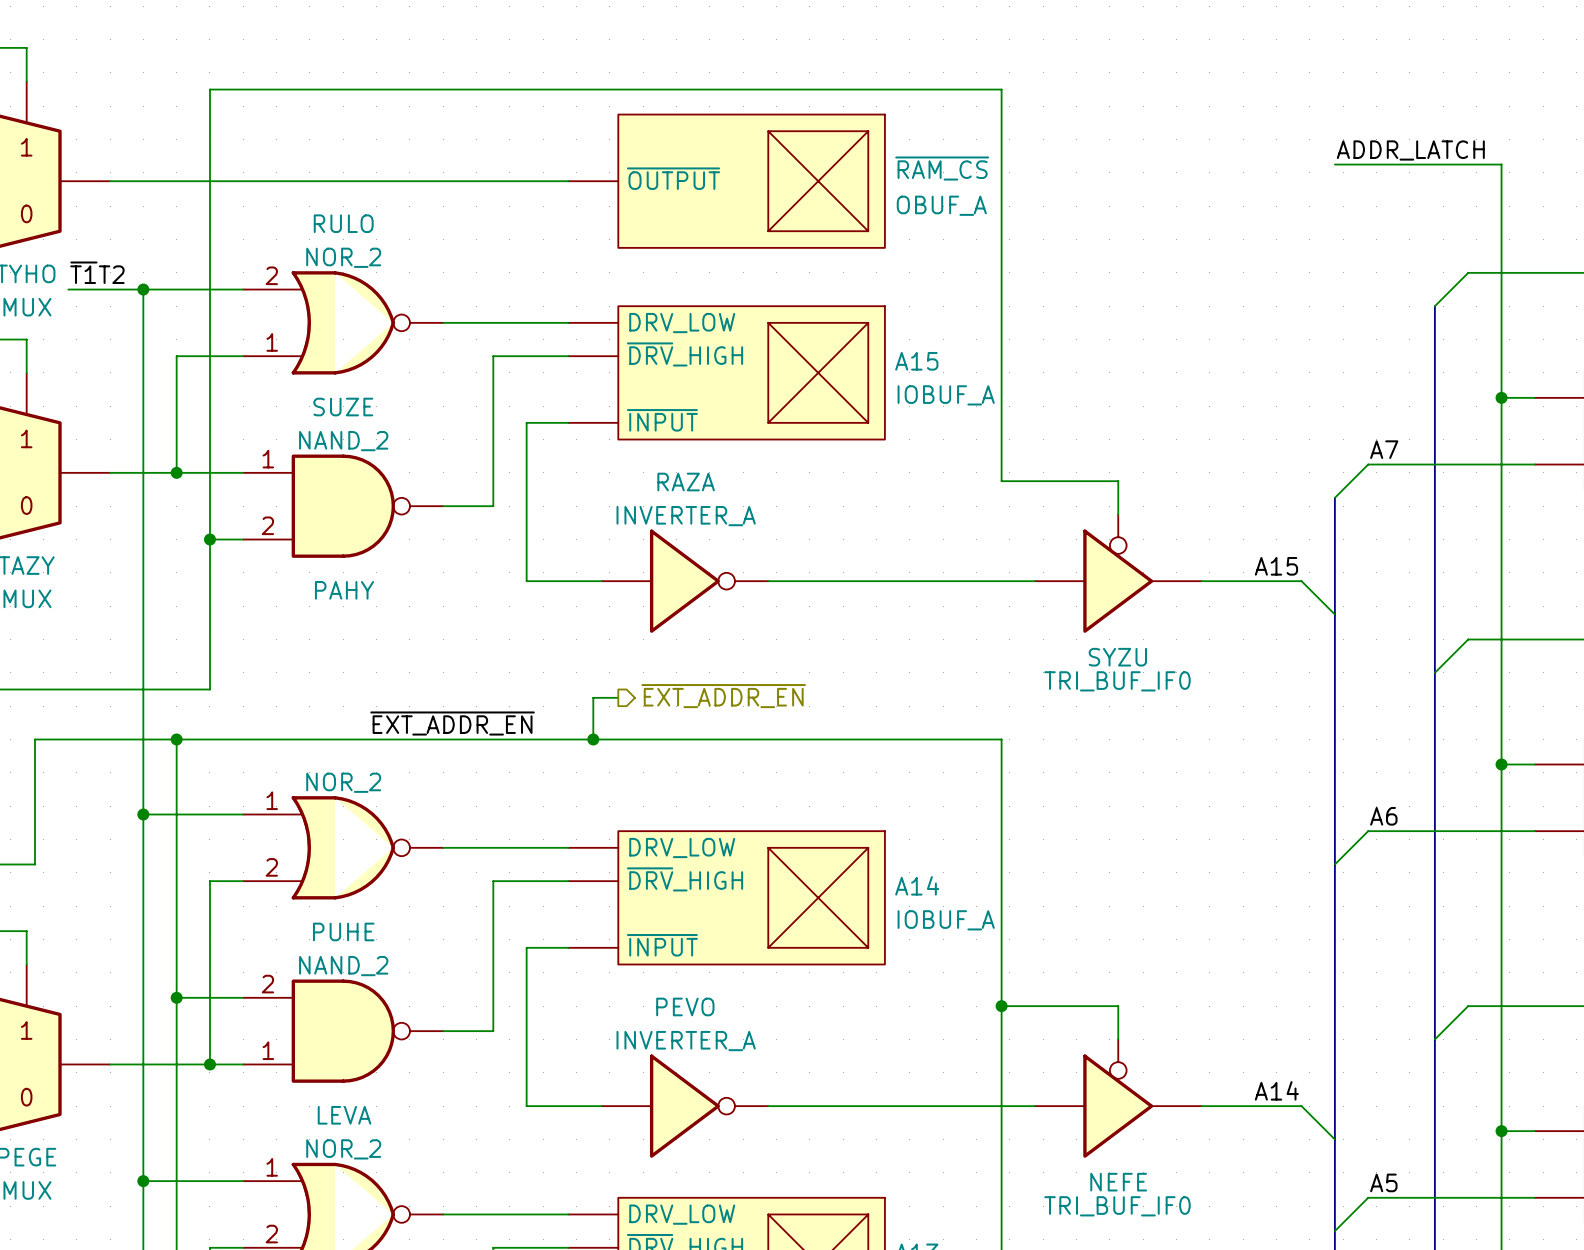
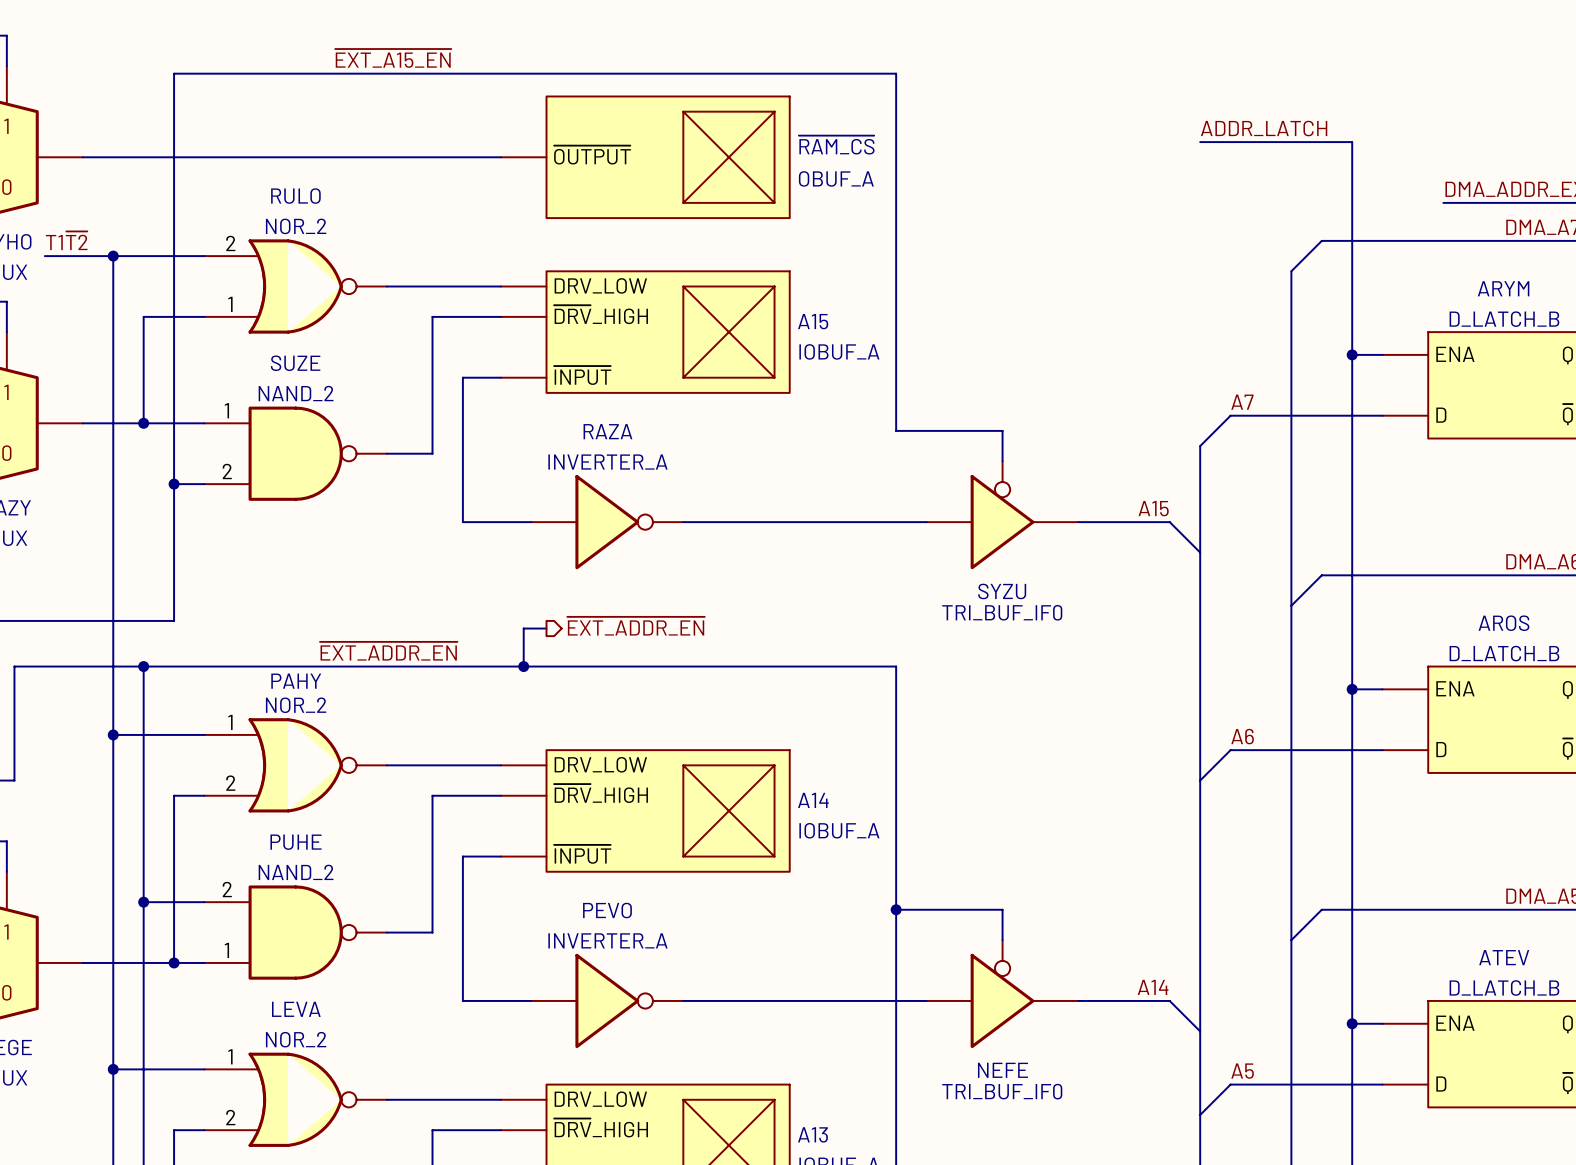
label: none -> ~{EXT_A15_EN} (393, 58)
label: ~{T1}T2 (97, 272) -> T1~{T2} (66, 240)
PAHY name position: PAHY (344, 590) -> PAHY (296, 681)

